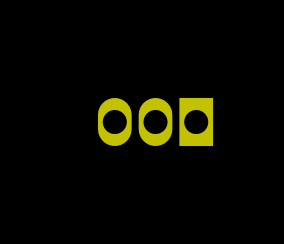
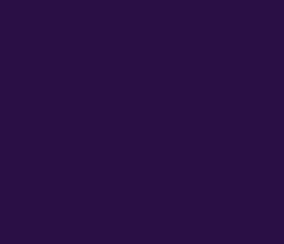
part: (155, 122) -> none

